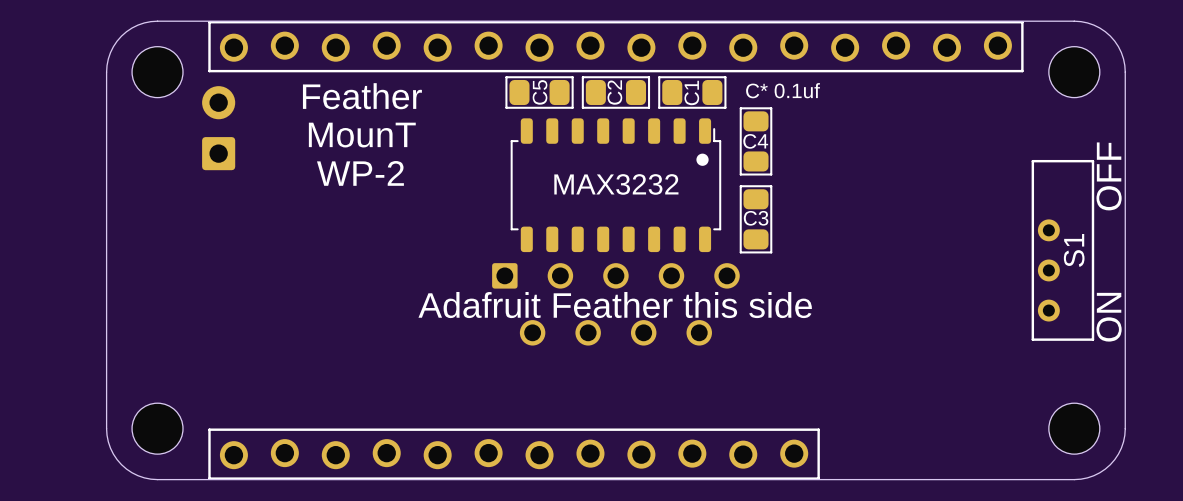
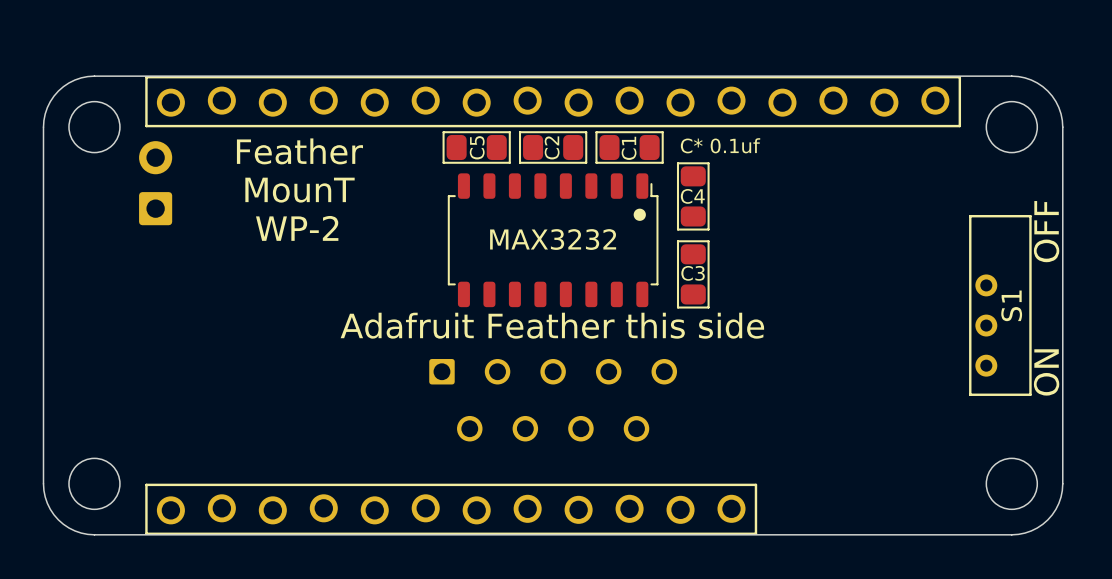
part position: (615, 304) -> (553, 400)
text position: Adafruit Feather this side (615, 305) -> Adafruit Feather this side (552, 325)

